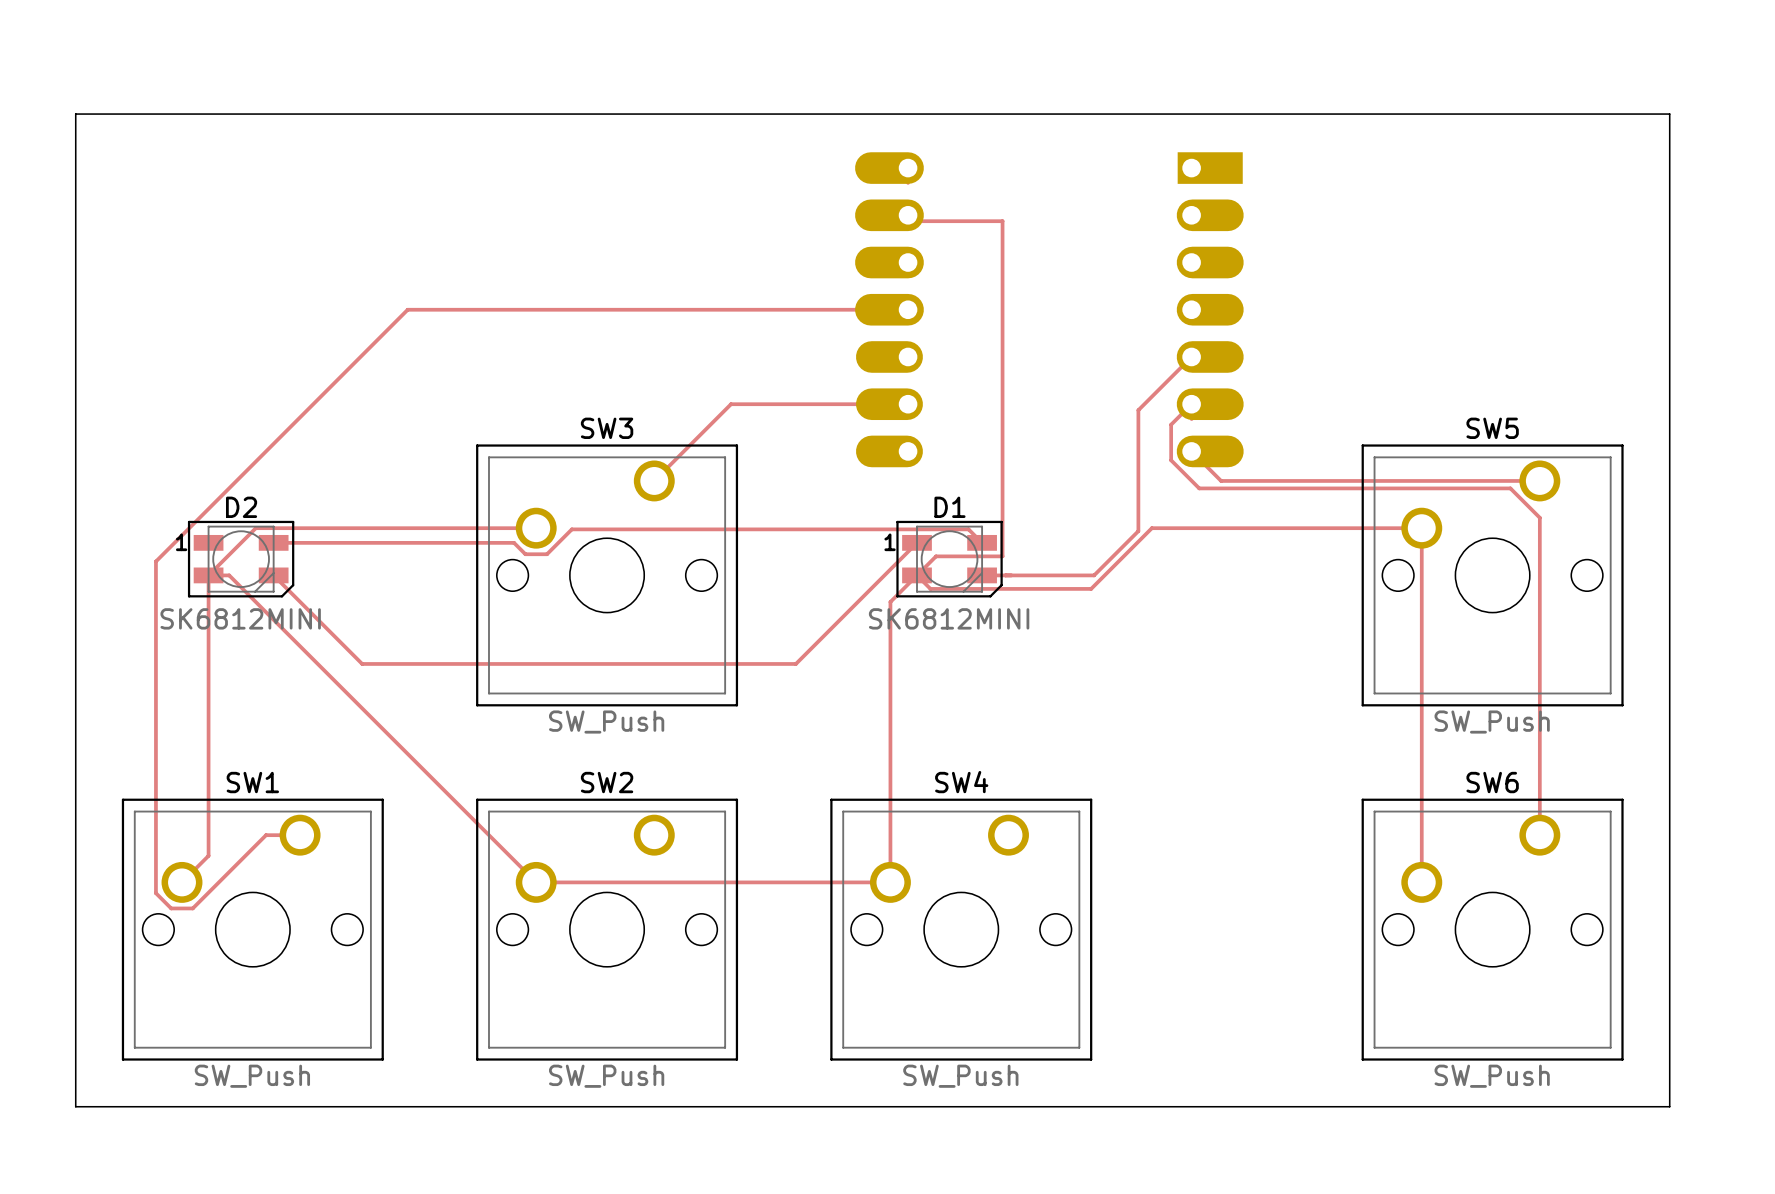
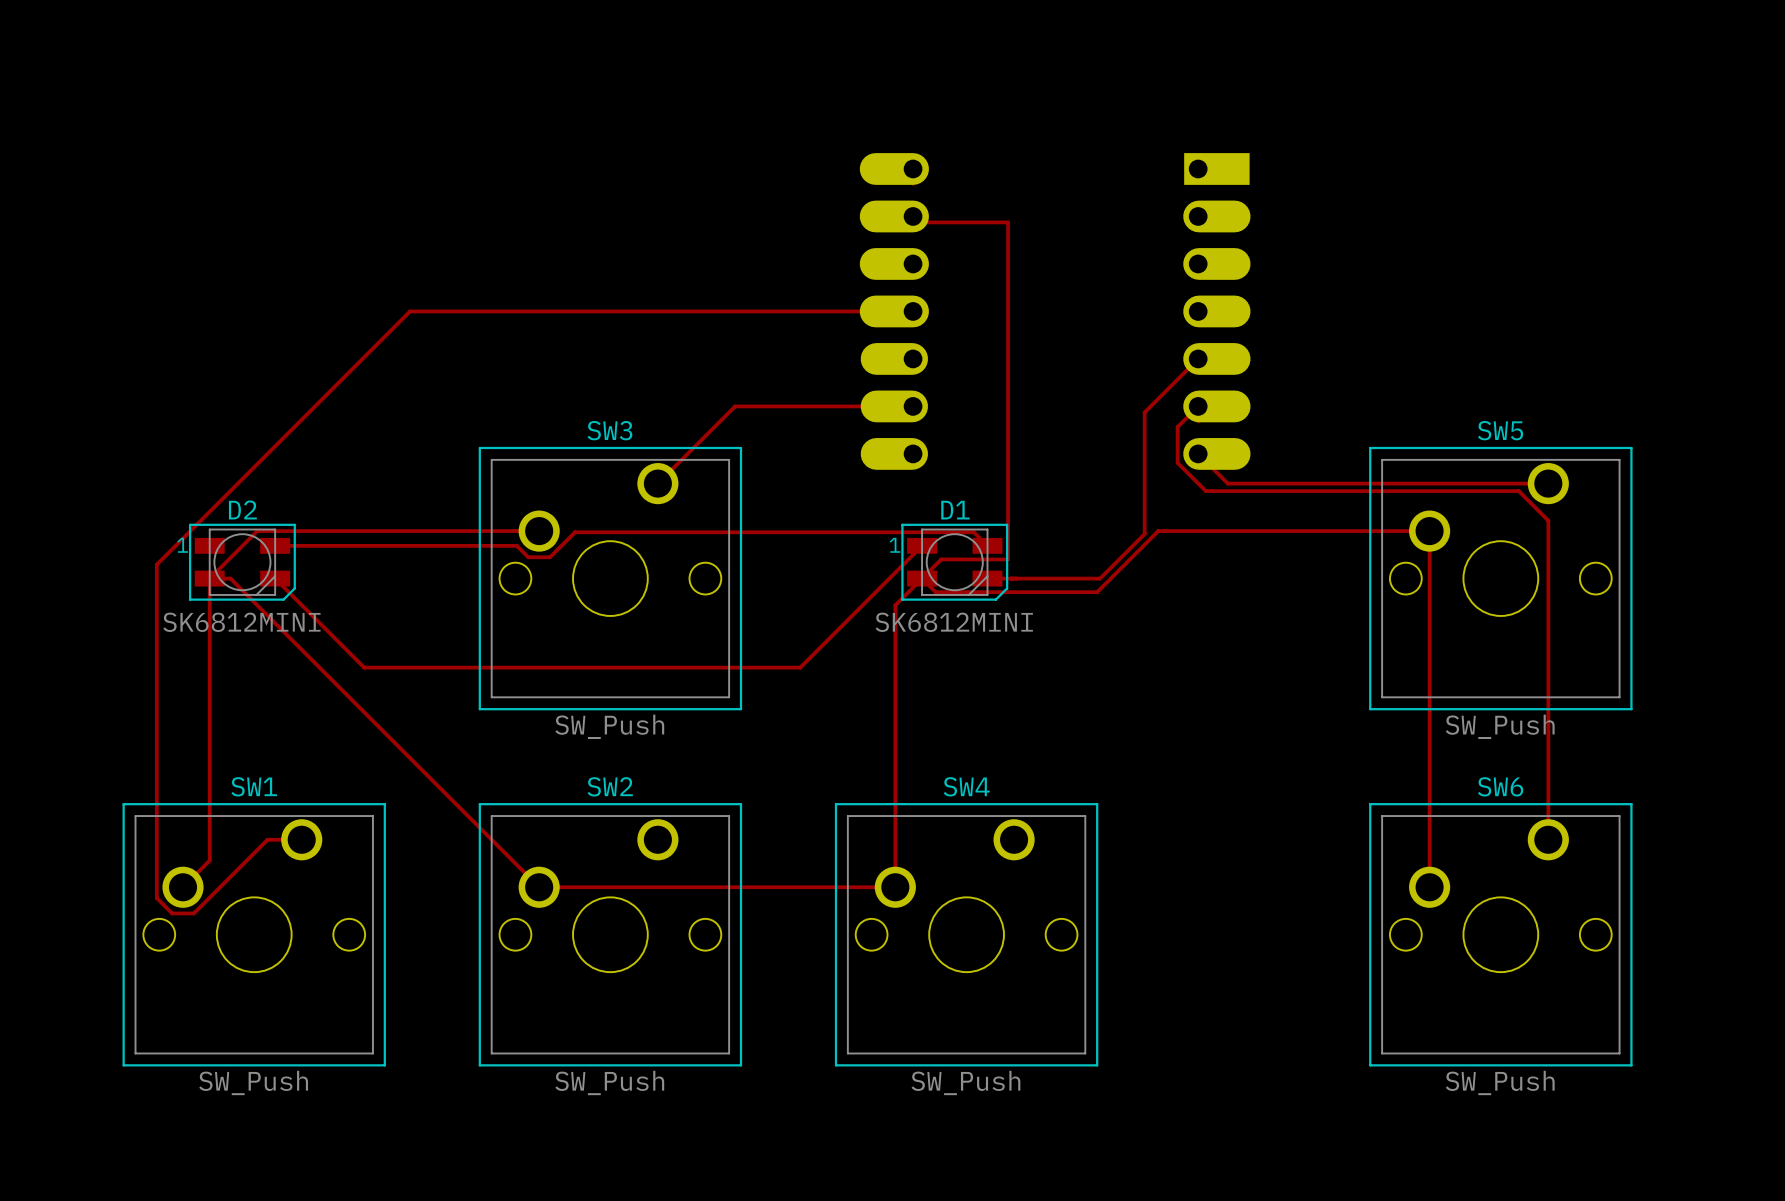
board edge: (75, 114) (1669, 114) (1669, 1106) (75, 1106) (75, 114) -> none

